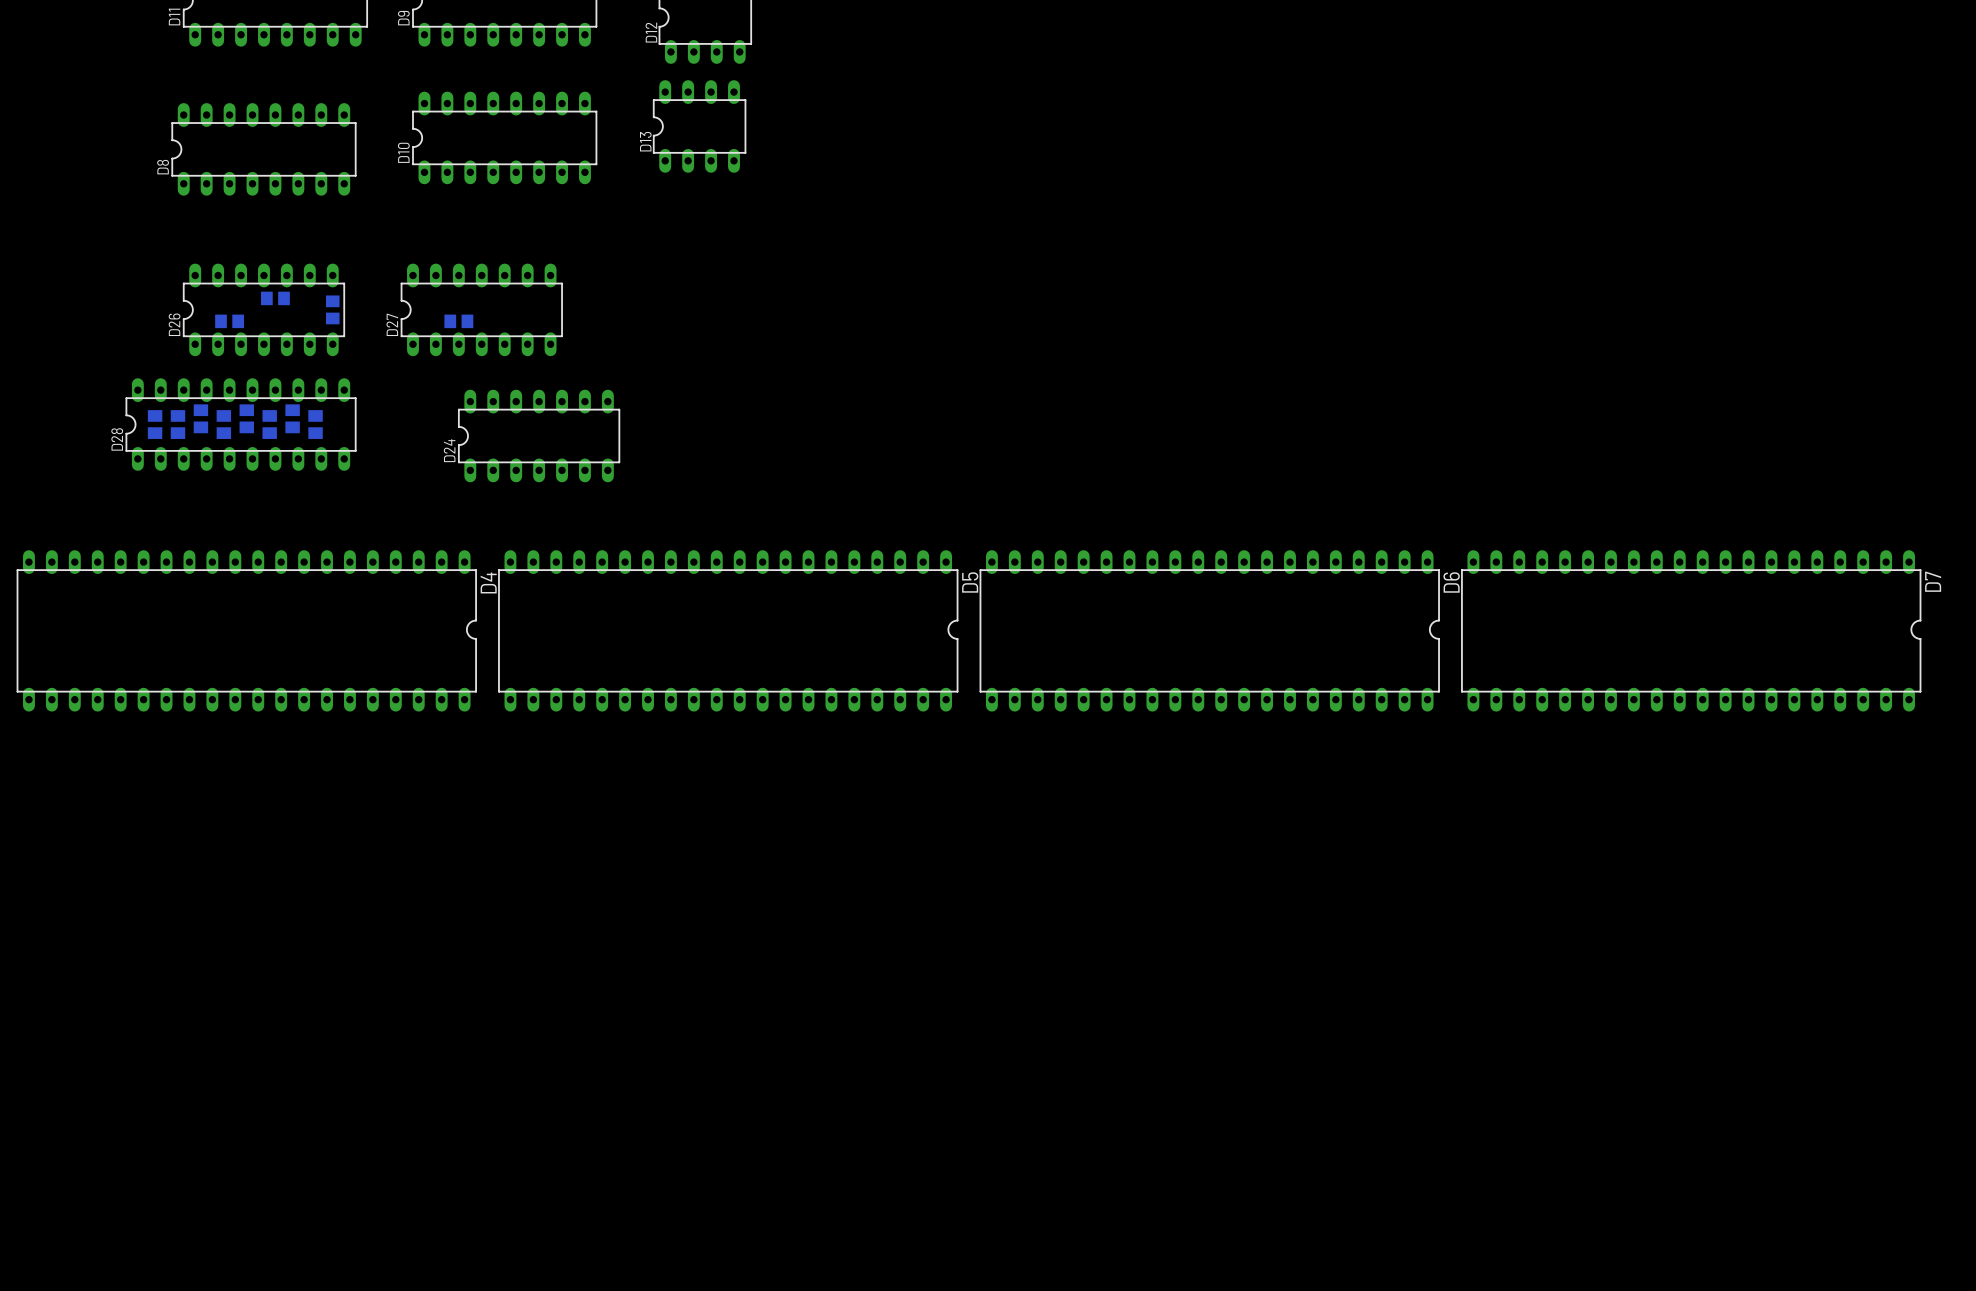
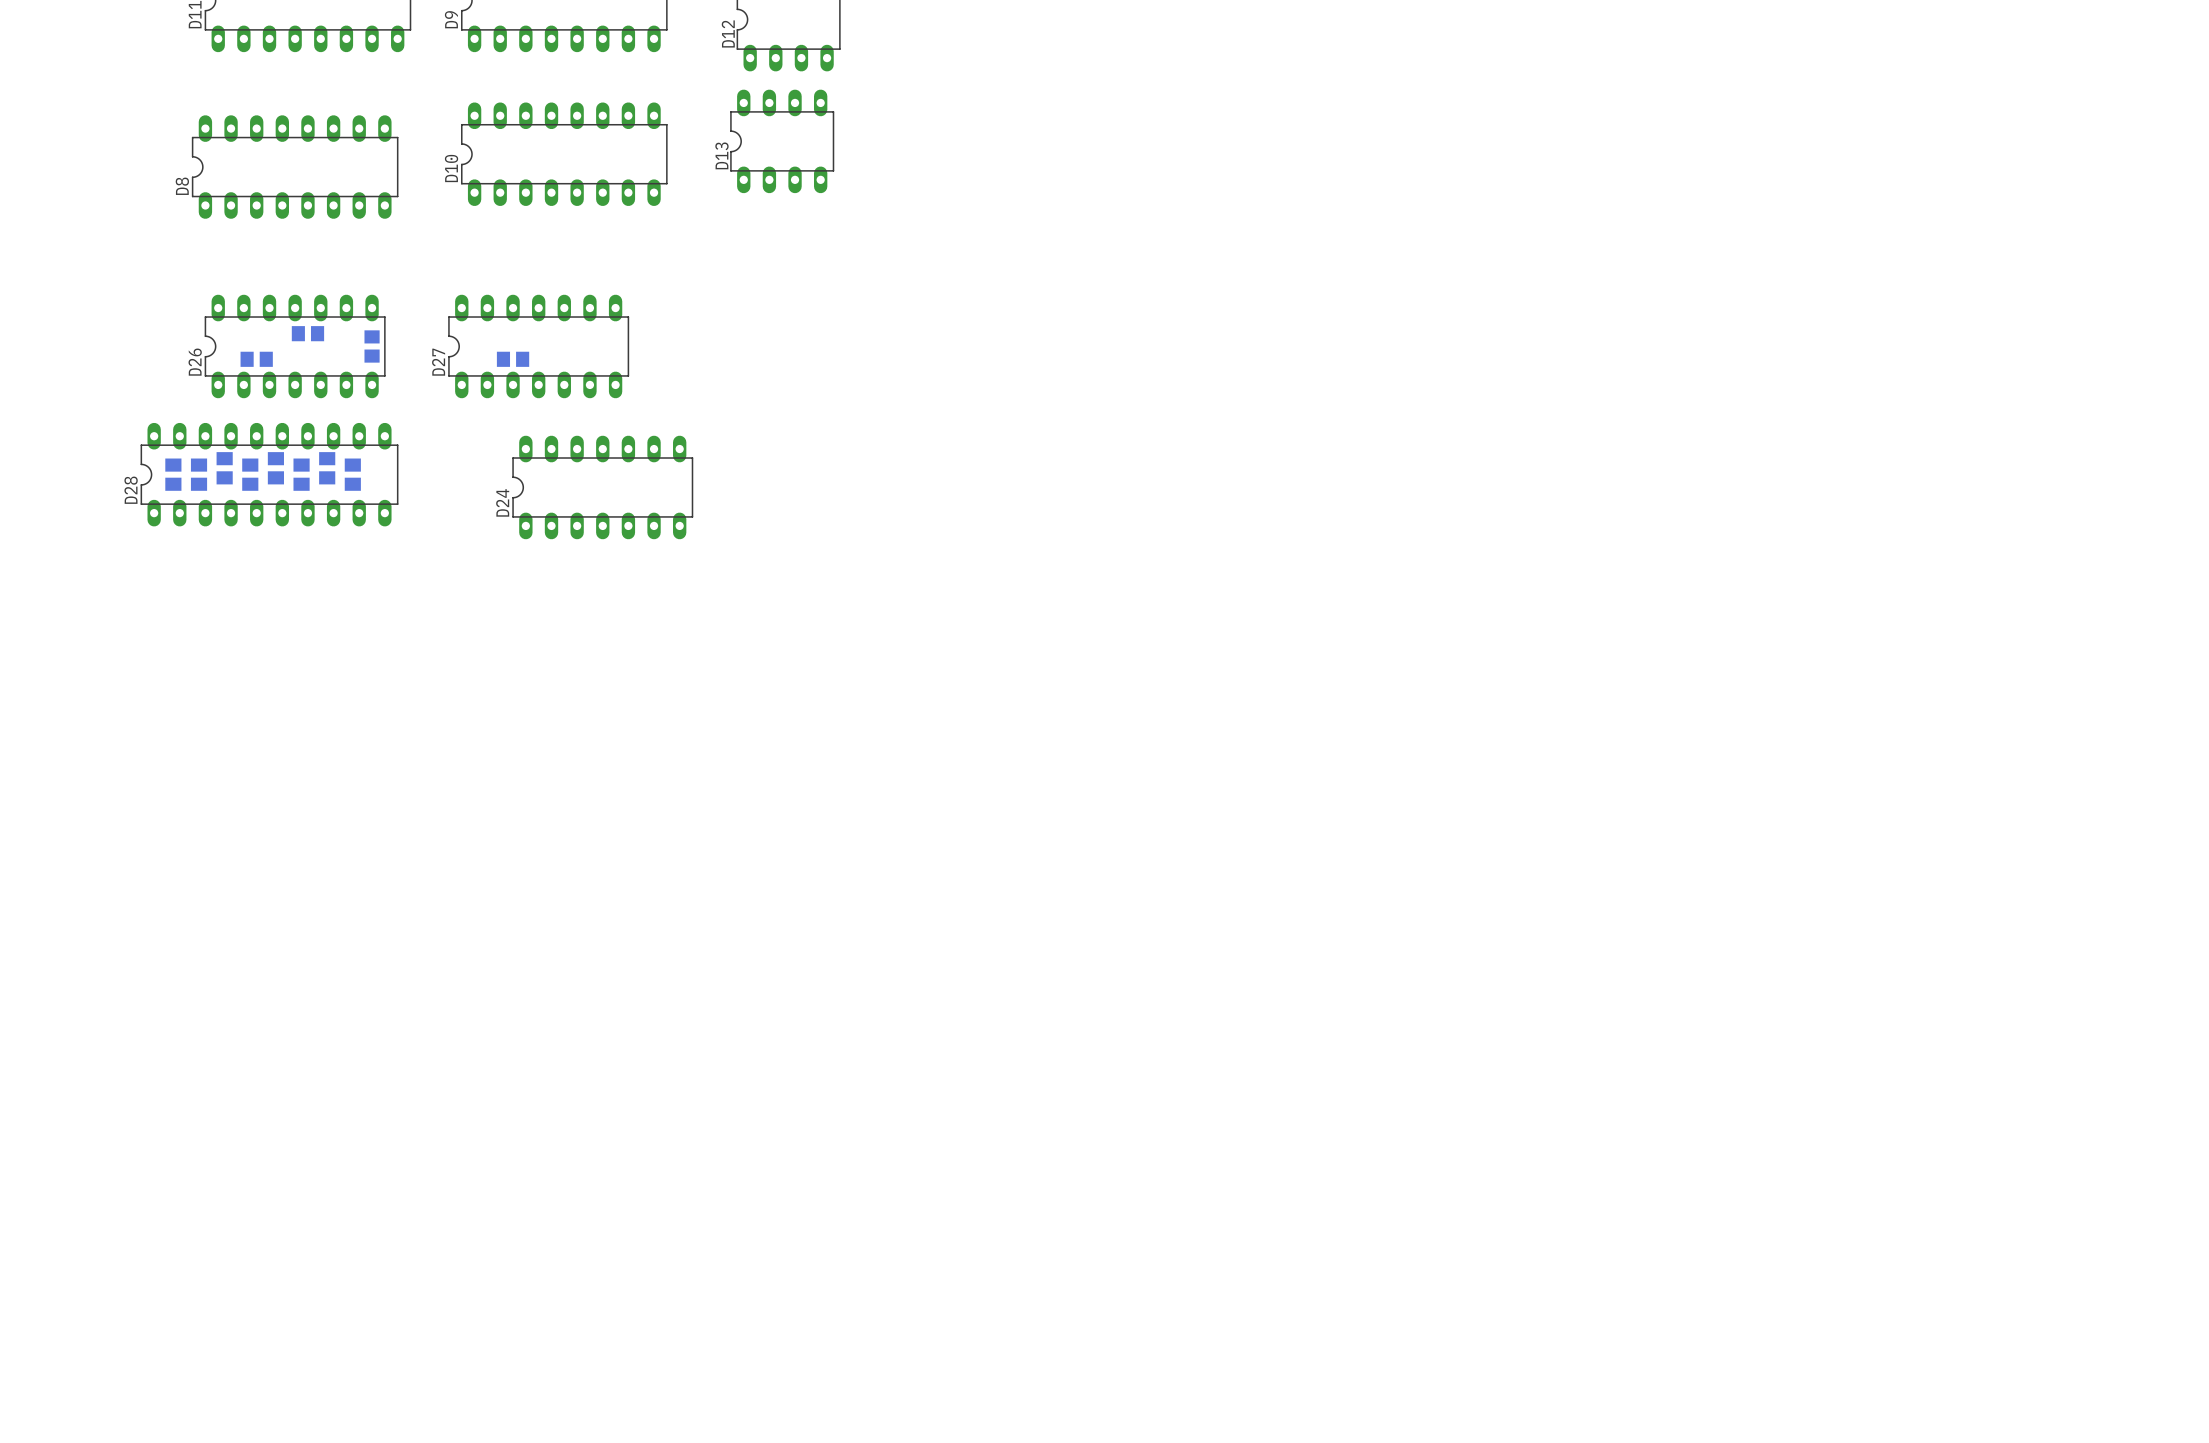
D4: (246, 630) -> none
D5: (728, 630) -> none
D6: (1209, 630) -> none
D7: (1691, 630) -> none

